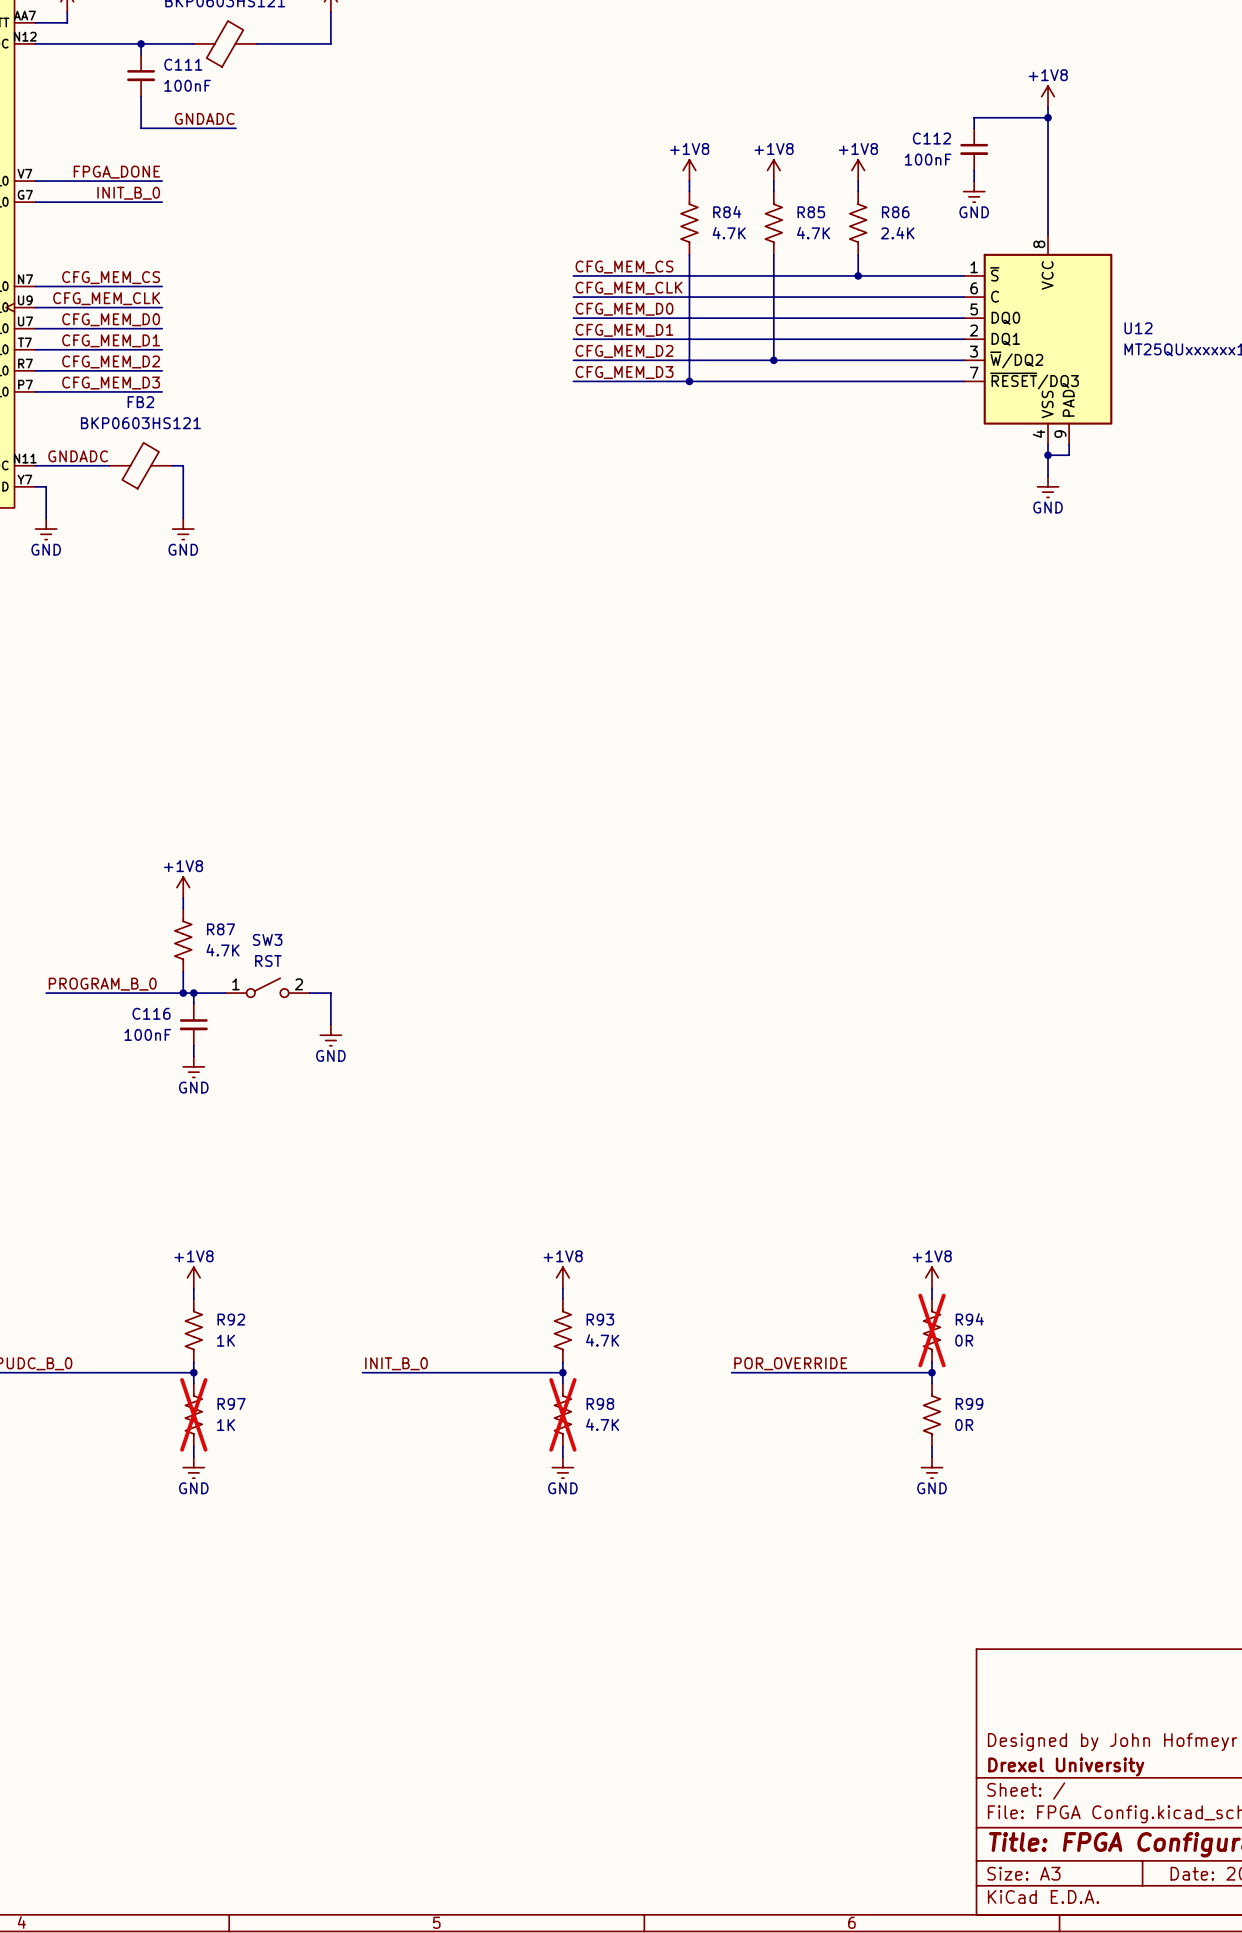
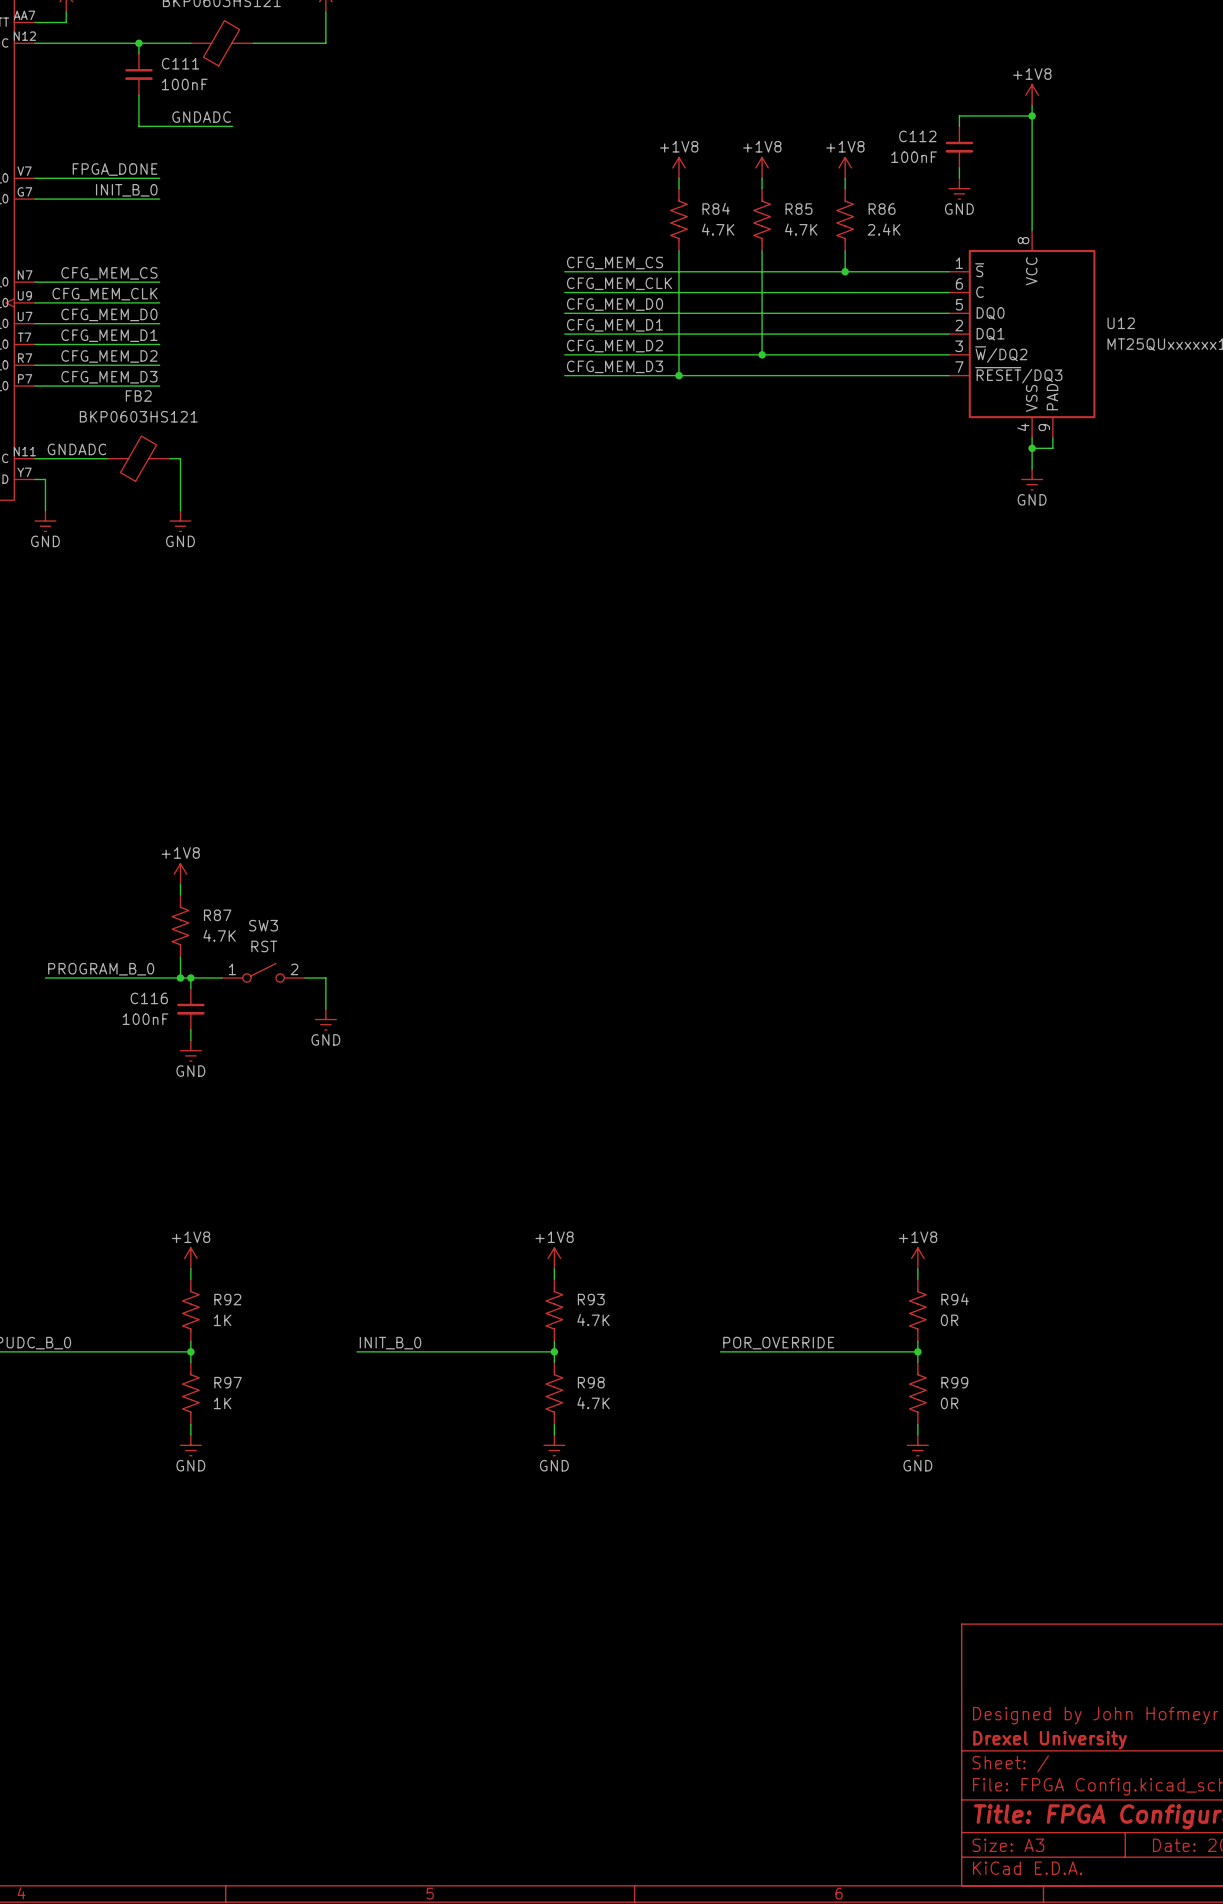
R94 do-not-place cross: (932, 1330) -> none
R97 do-not-place cross: (193, 1414) -> none
R98 do-not-place cross: (562, 1414) -> none

